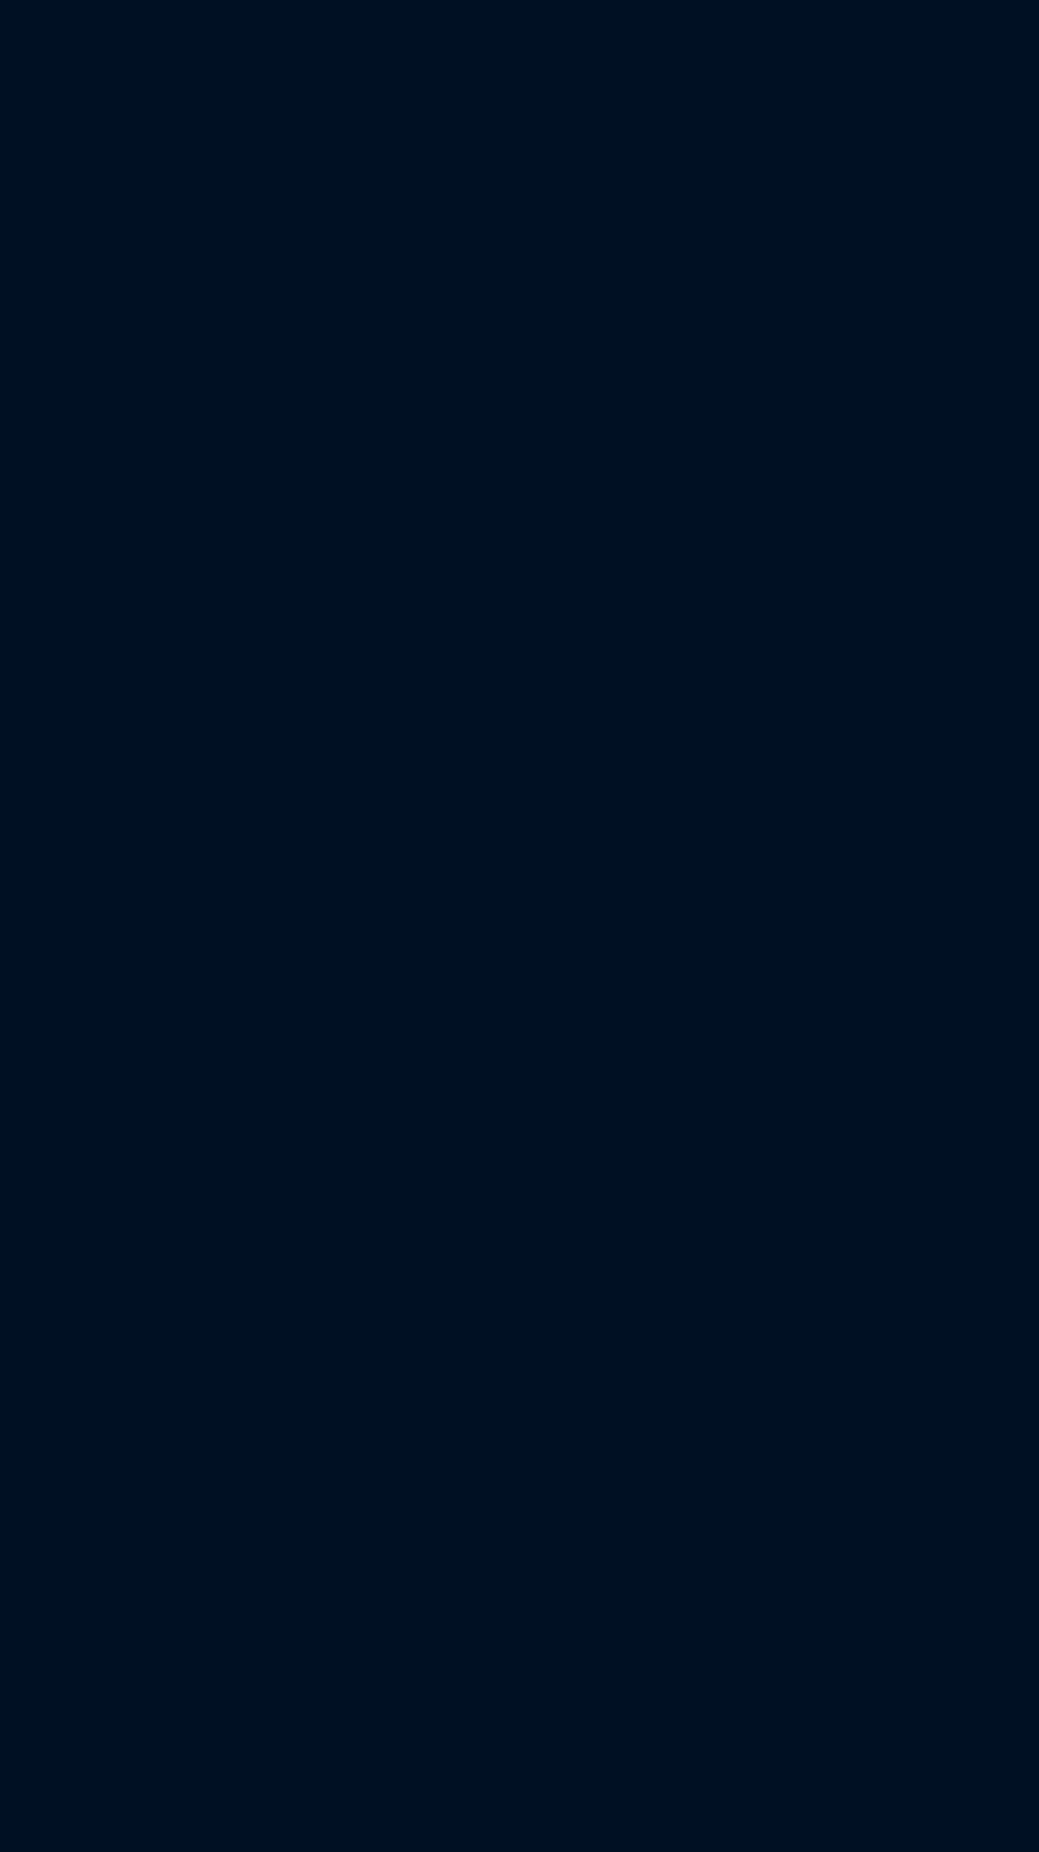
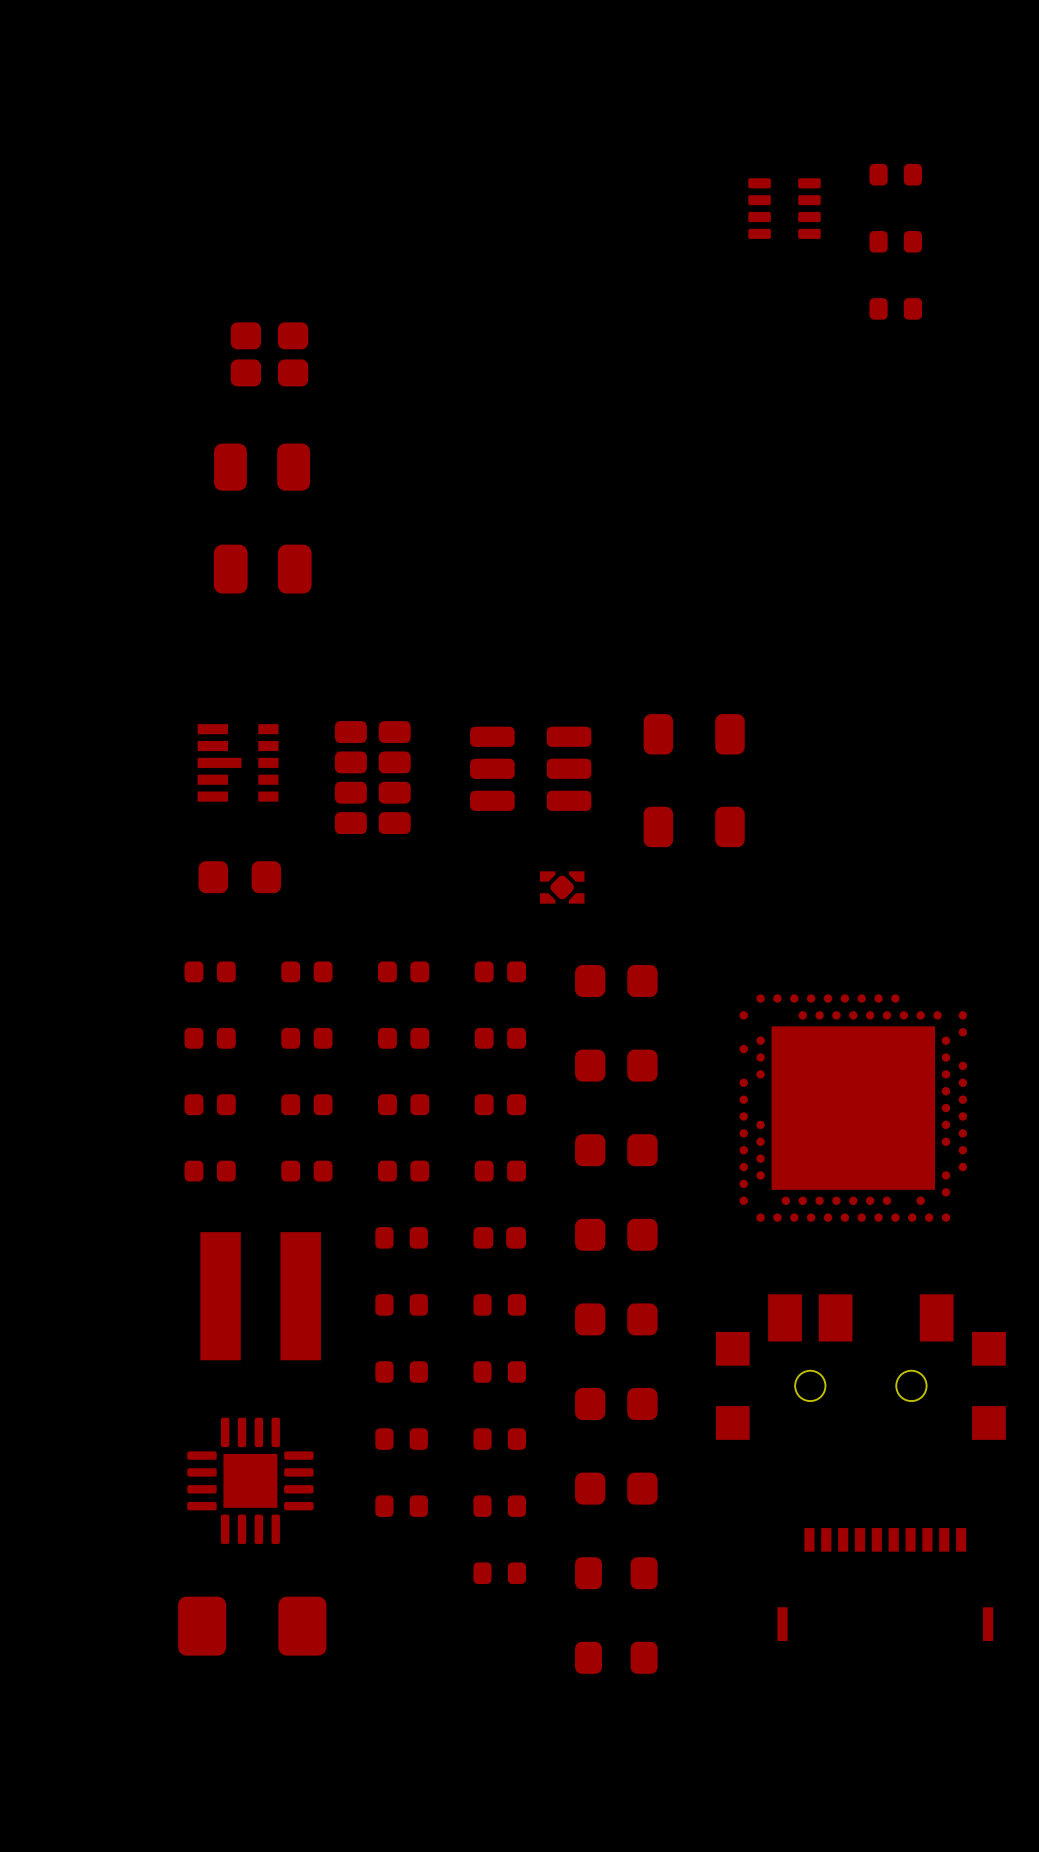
part: none -> (895, 174)
part: none -> (784, 208)
part: none -> (895, 241)
part: none -> (895, 308)
part: none -> (269, 354)
part: none -> (262, 467)
part: none -> (262, 569)
part: none -> (694, 734)
part: none -> (238, 762)
part: none -> (530, 768)
part: none -> (372, 777)
part: none -> (694, 826)
part: none -> (239, 877)
part: none -> (562, 887)
part: none -> (210, 971)
part: none -> (306, 971)
part: none -> (403, 971)
part: none -> (500, 971)
part: none -> (616, 980)
part: none -> (210, 1038)
part: none -> (306, 1038)
part: none -> (403, 1038)
part: none -> (500, 1038)
part: none -> (616, 1065)
part: none -> (210, 1104)
part: none -> (306, 1104)
part: none -> (403, 1104)
part: none -> (500, 1104)
part: none -> (853, 1108)
part: none -> (616, 1150)
part: none -> (210, 1171)
part: none -> (306, 1171)
part: none -> (403, 1171)
part: none -> (500, 1171)
part: none -> (616, 1234)
part: none -> (401, 1237)
part: none -> (499, 1237)
part: none -> (260, 1296)
part: none -> (401, 1304)
part: none -> (499, 1304)
part: none -> (616, 1319)
part: none -> (860, 1367)
part: none -> (401, 1371)
part: none -> (499, 1371)
part: none -> (616, 1404)
part: none -> (401, 1439)
part: none -> (499, 1439)
part: none -> (250, 1480)
part: none -> (616, 1488)
part: none -> (401, 1506)
part: none -> (499, 1506)
part: none -> (499, 1573)
part: none -> (616, 1573)
part: none -> (885, 1584)
part: none -> (252, 1626)
part: none -> (616, 1657)

